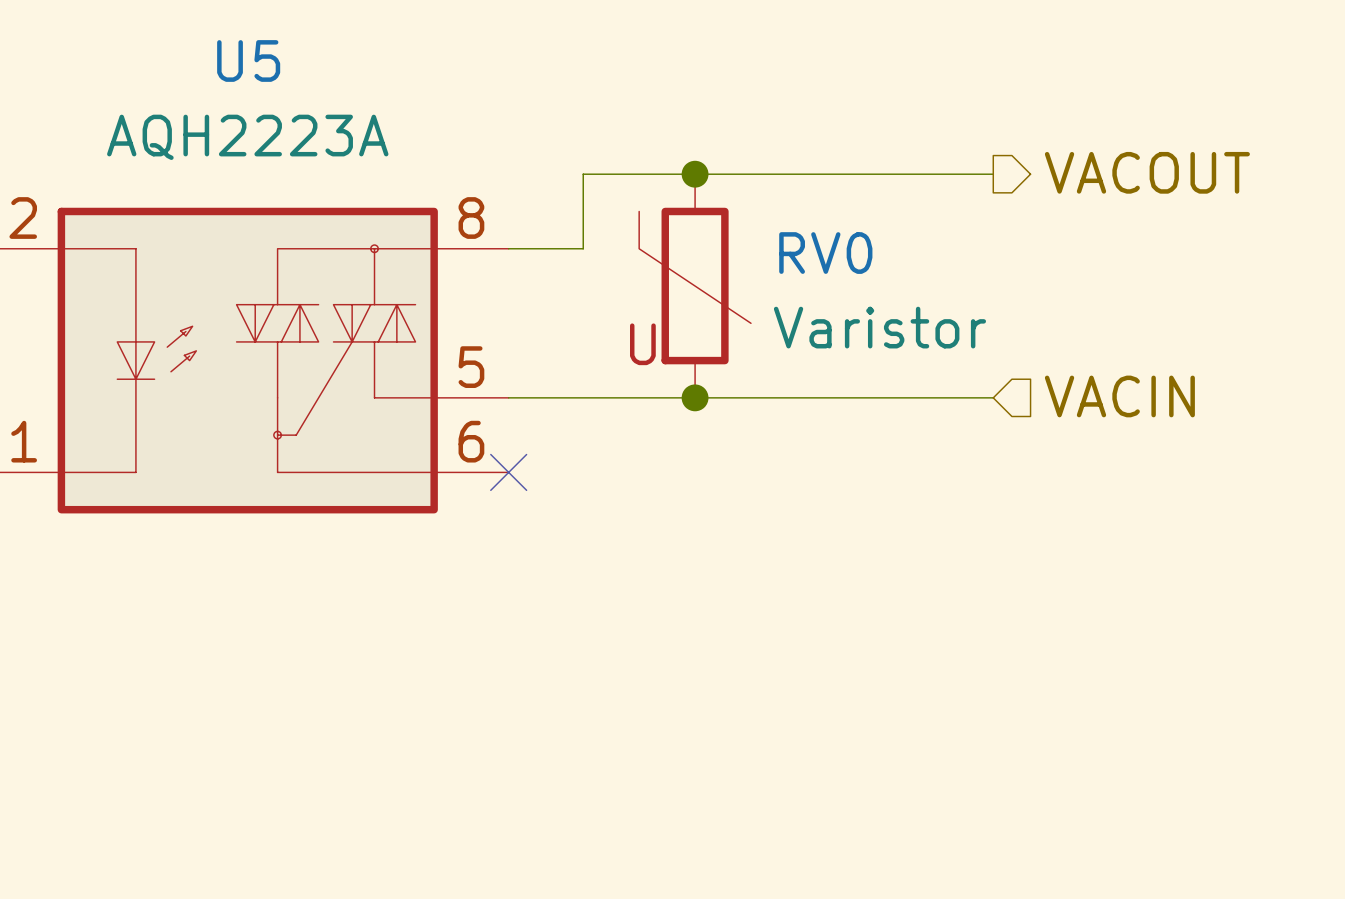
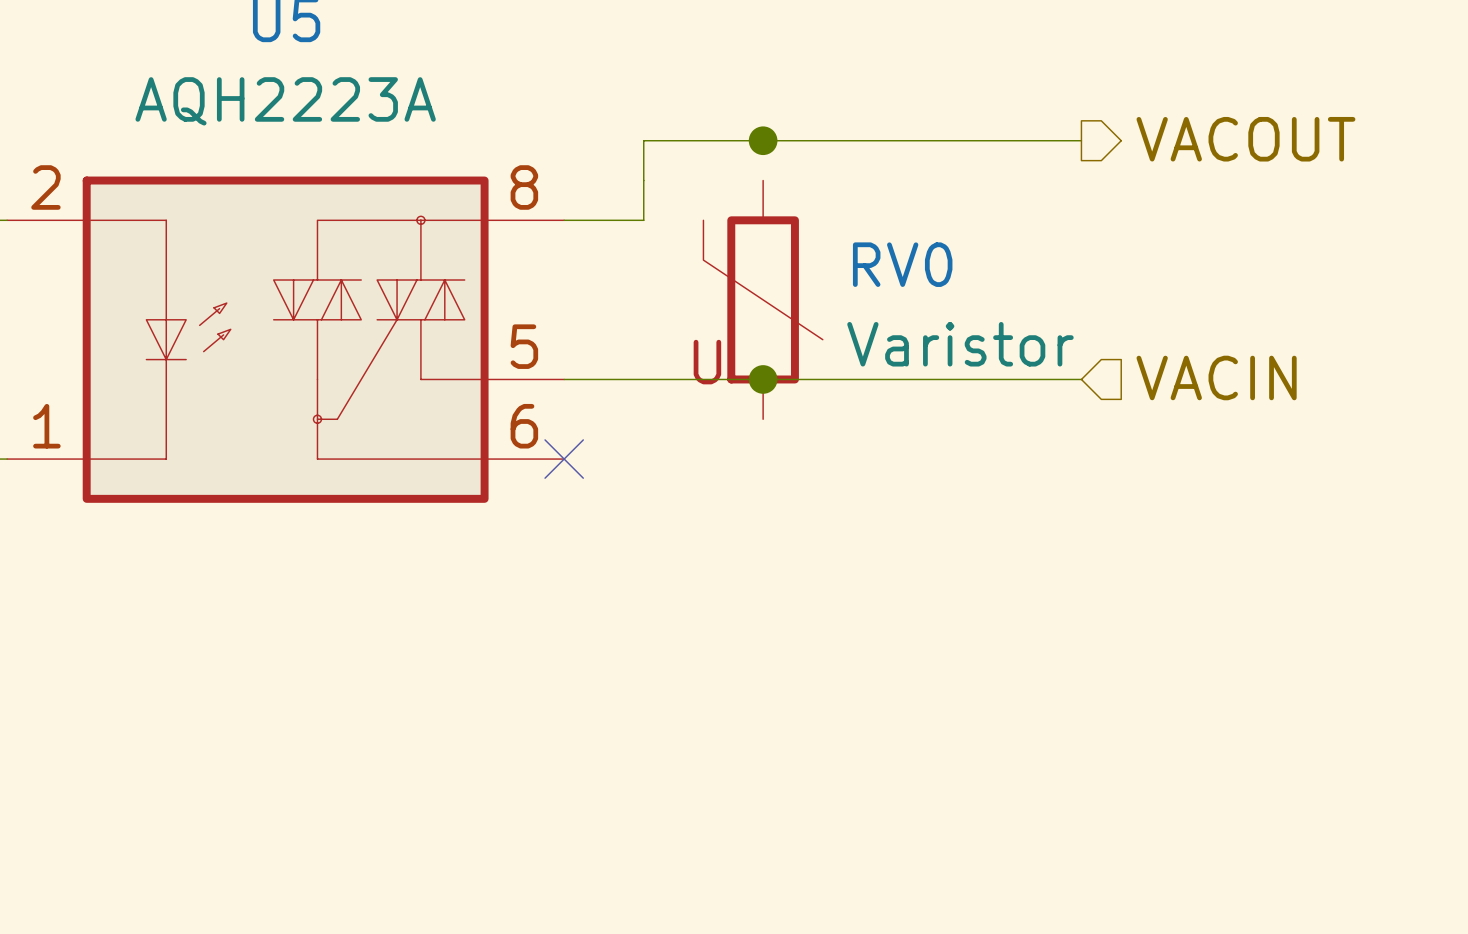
RV0 position: (695, 286) -> (763, 299)

